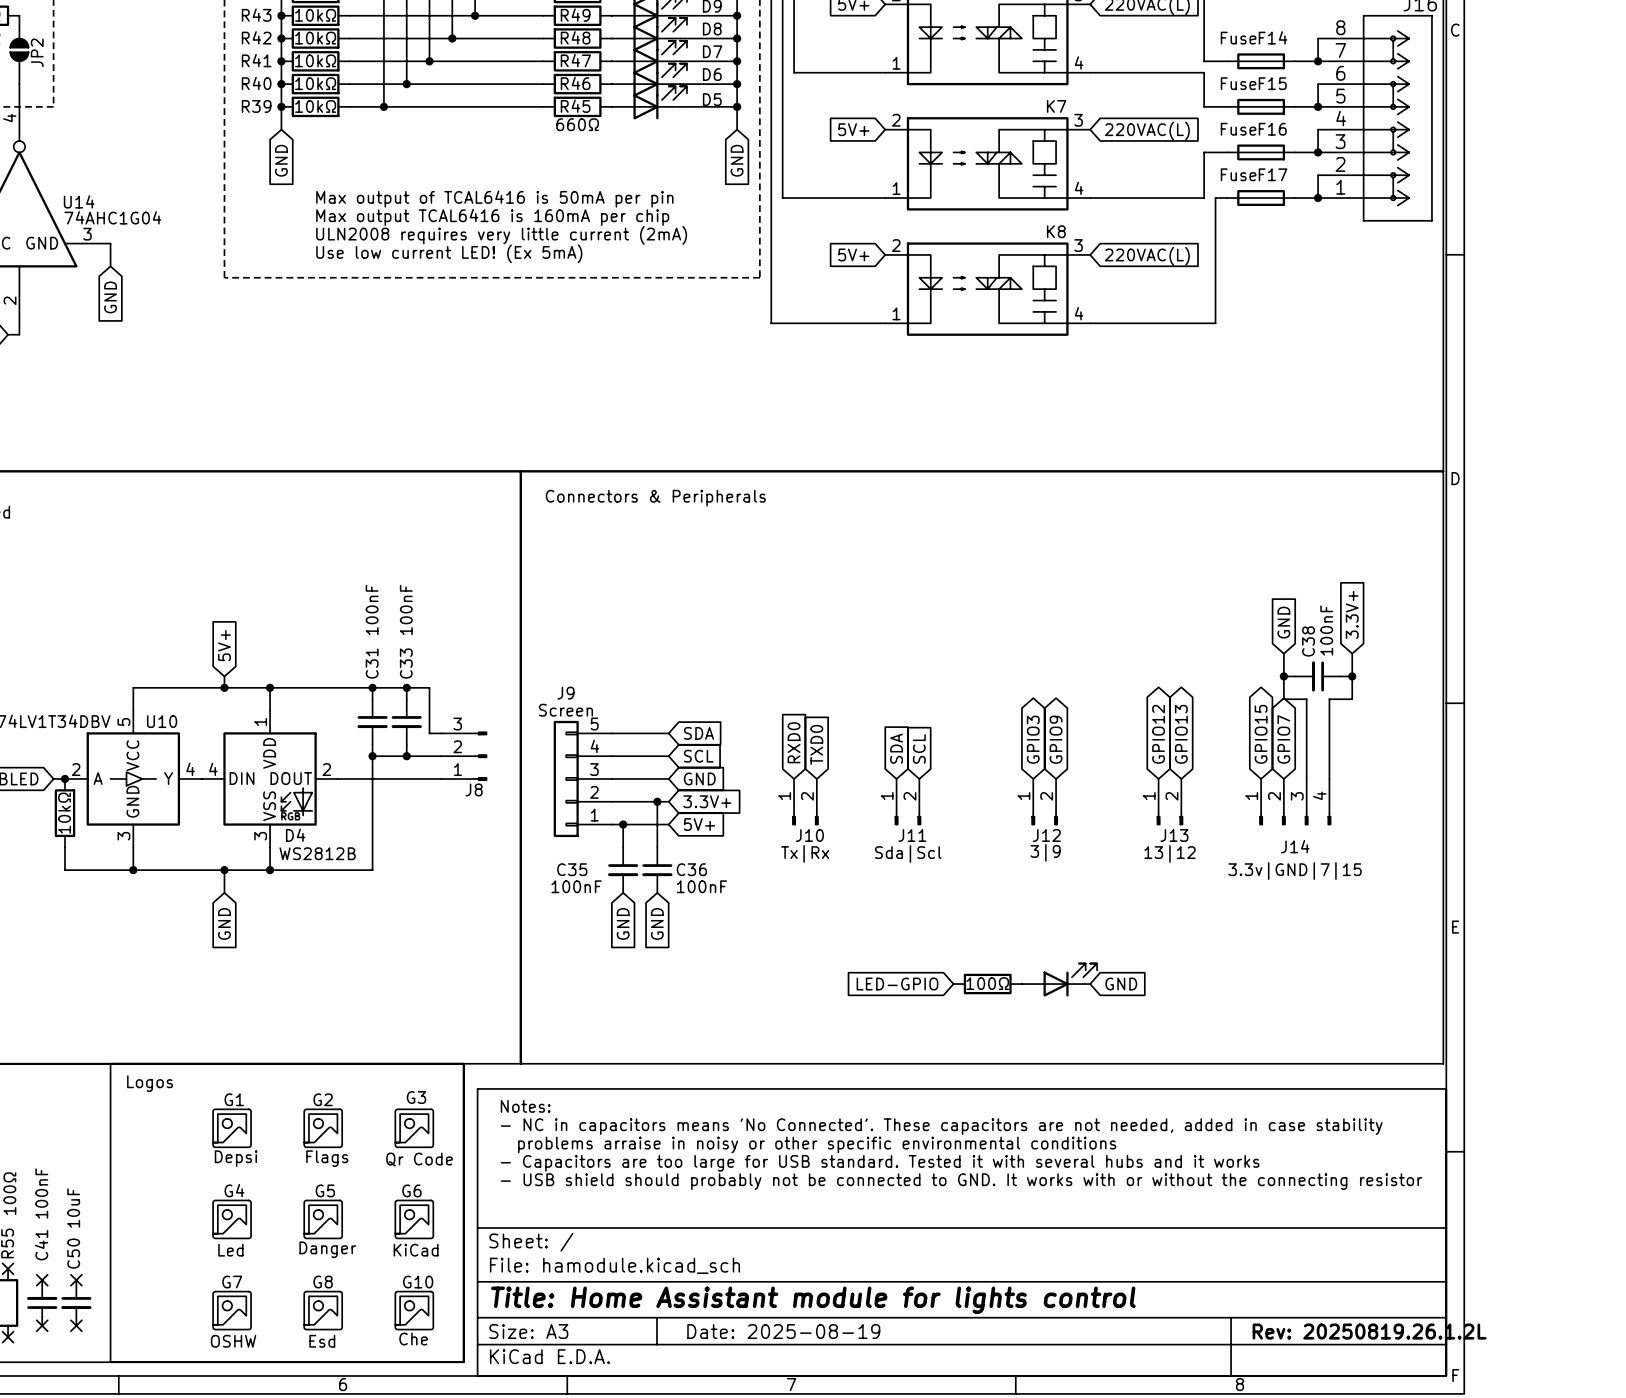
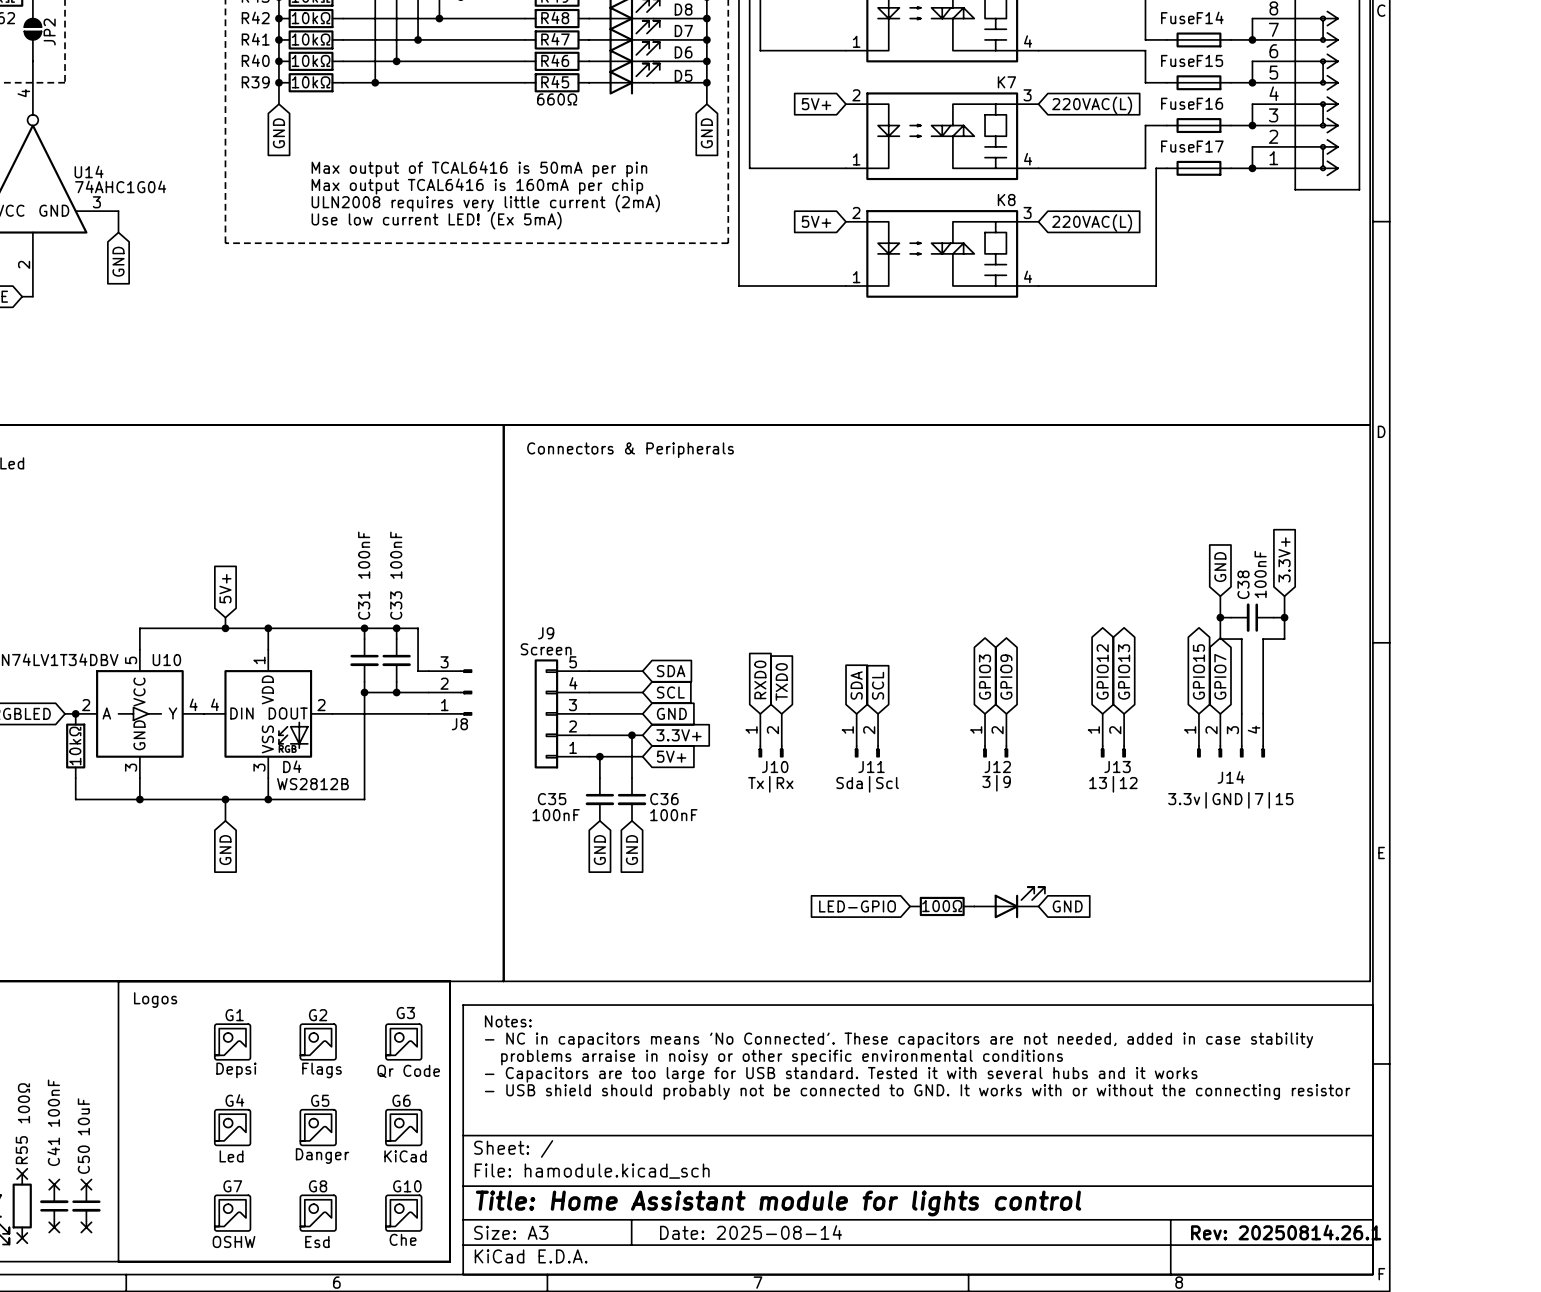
title block: Date: 2025-08-19 (783, 1331) -> Date: 2025-08-14 (751, 1232)
title block: Rev: 20250819.26.1.2L (1369, 1331) -> Rev: 20250814.26.1 (1286, 1232)

